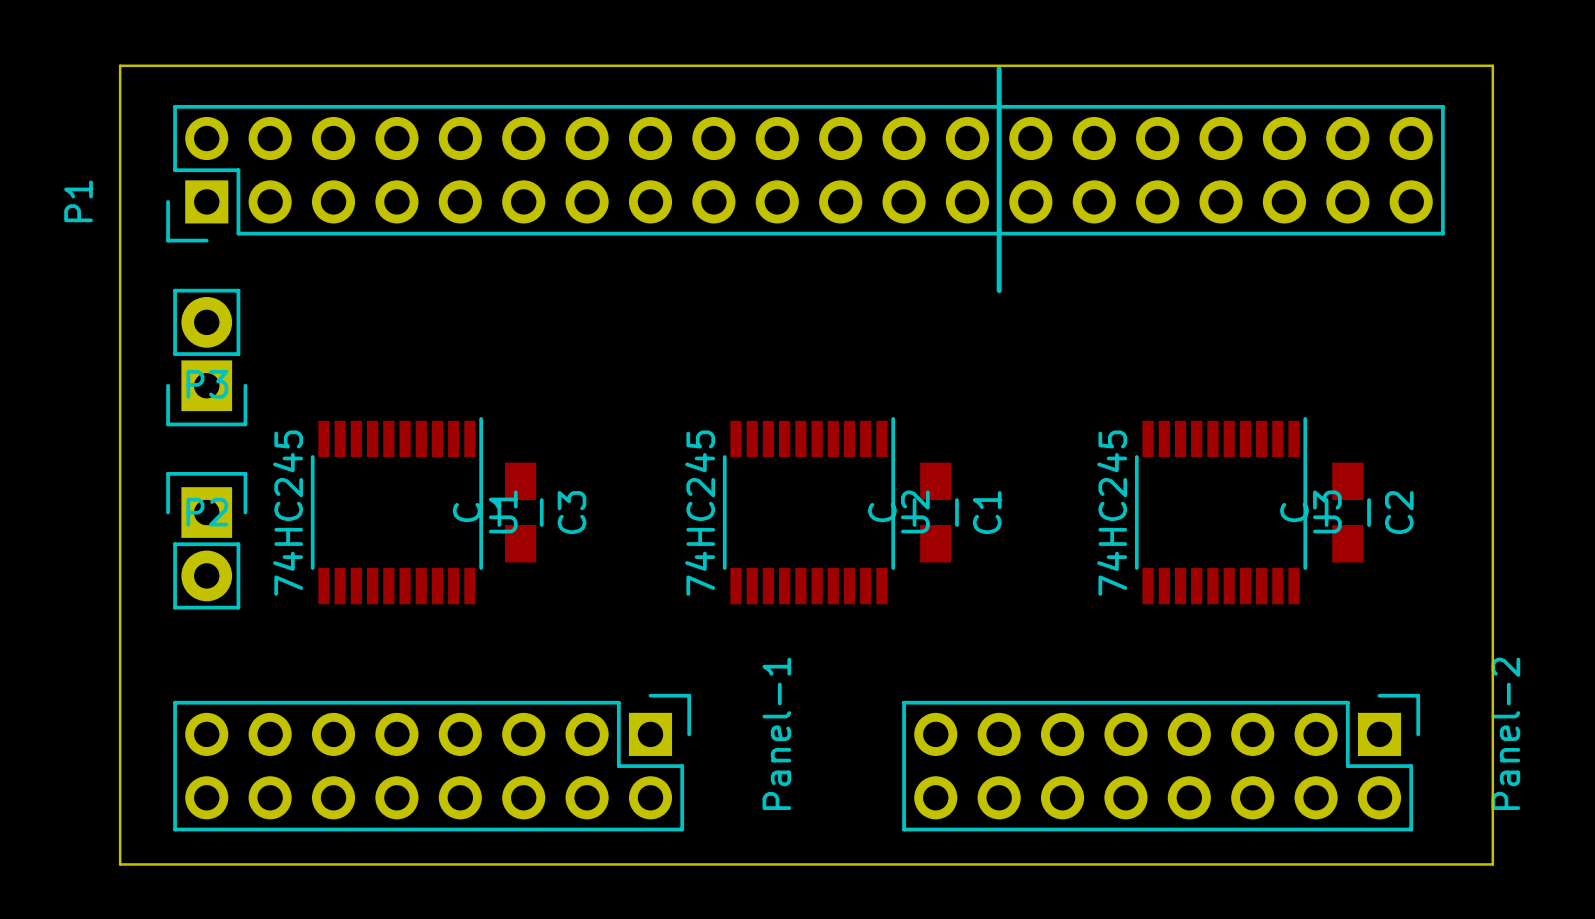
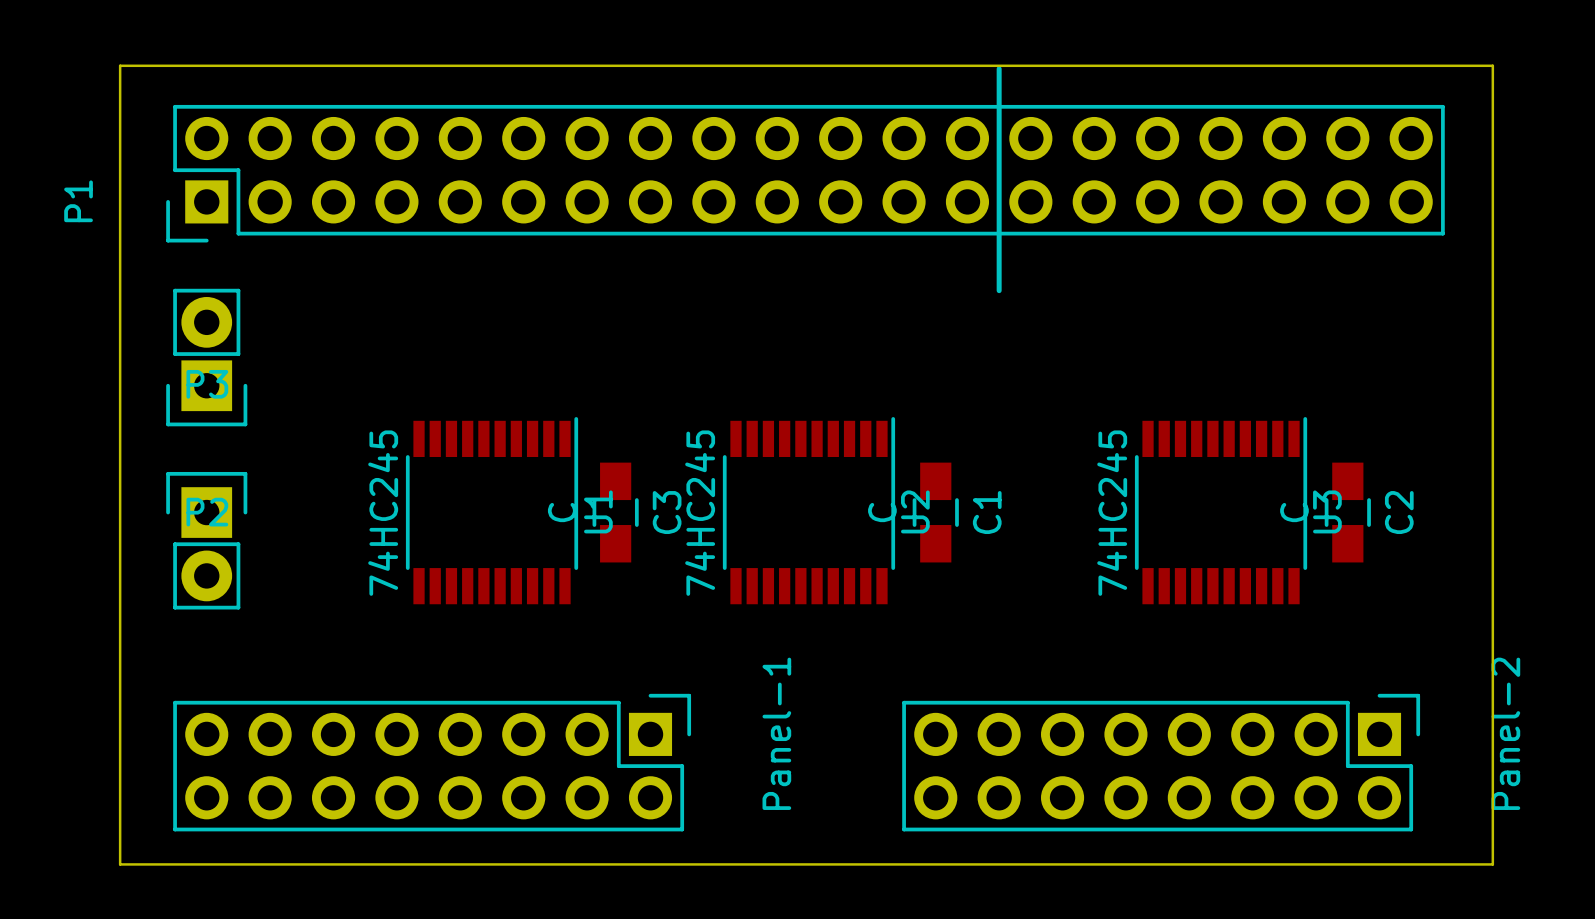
U1 position: (396, 510) -> (492, 510)
C3 position: (520, 512) -> (615, 512)

